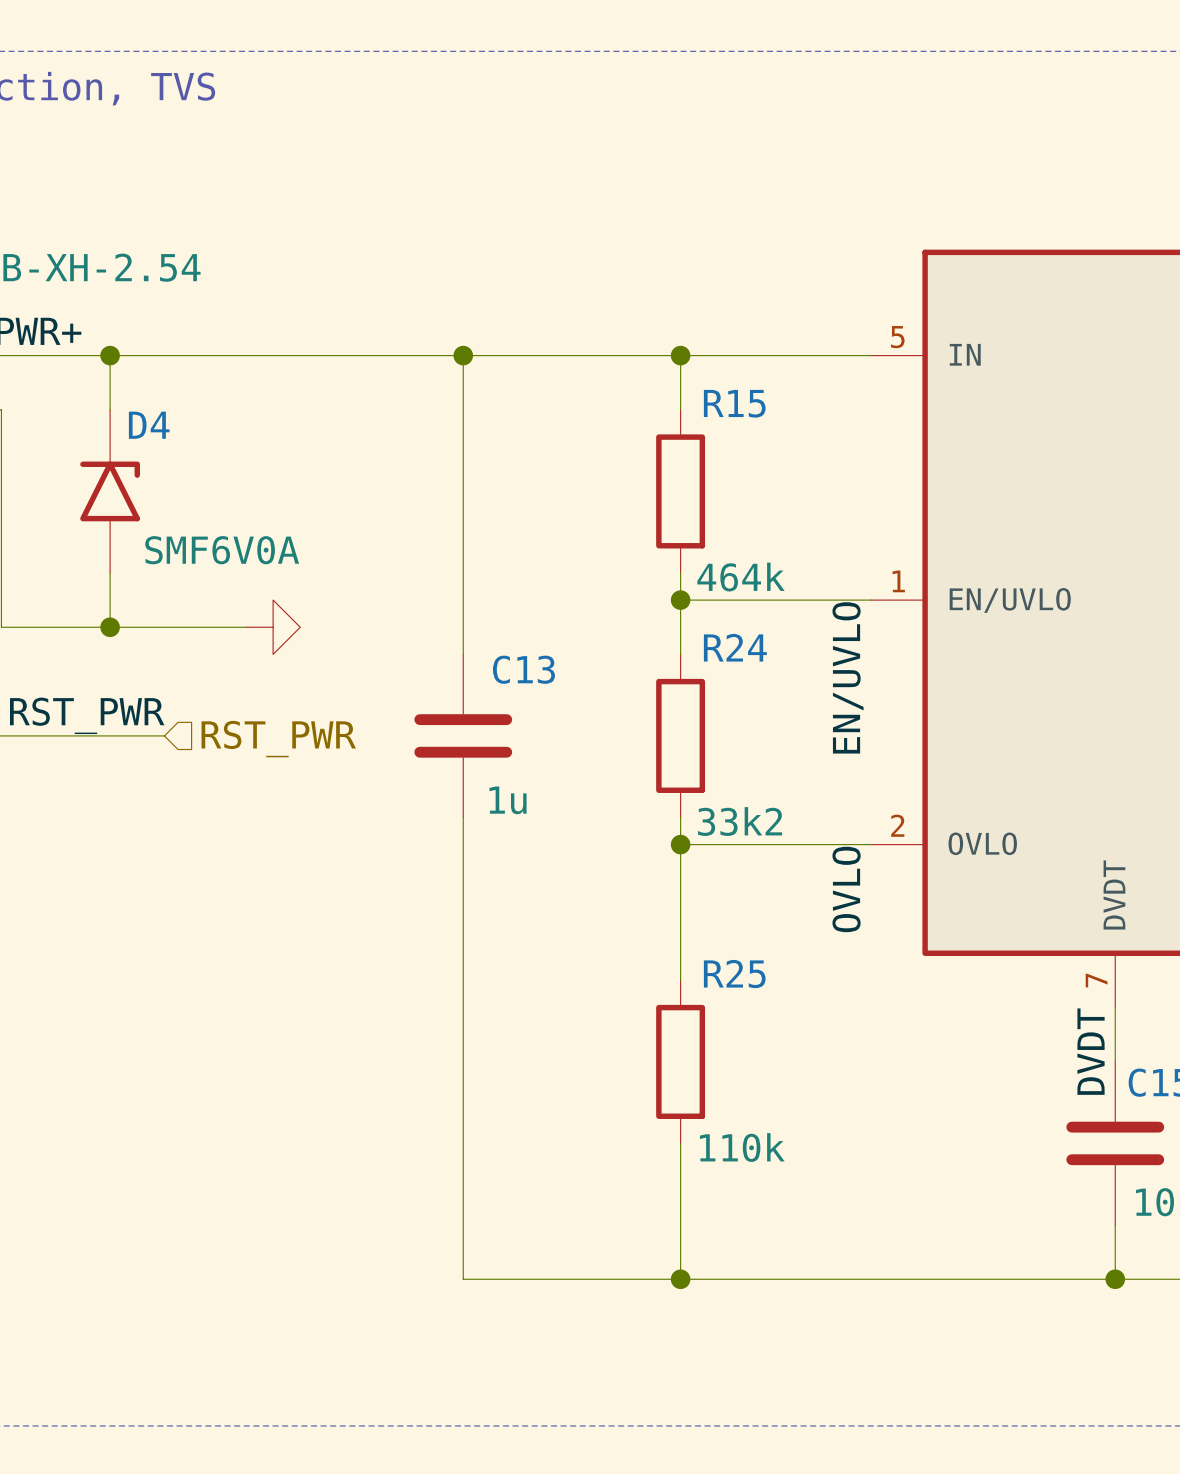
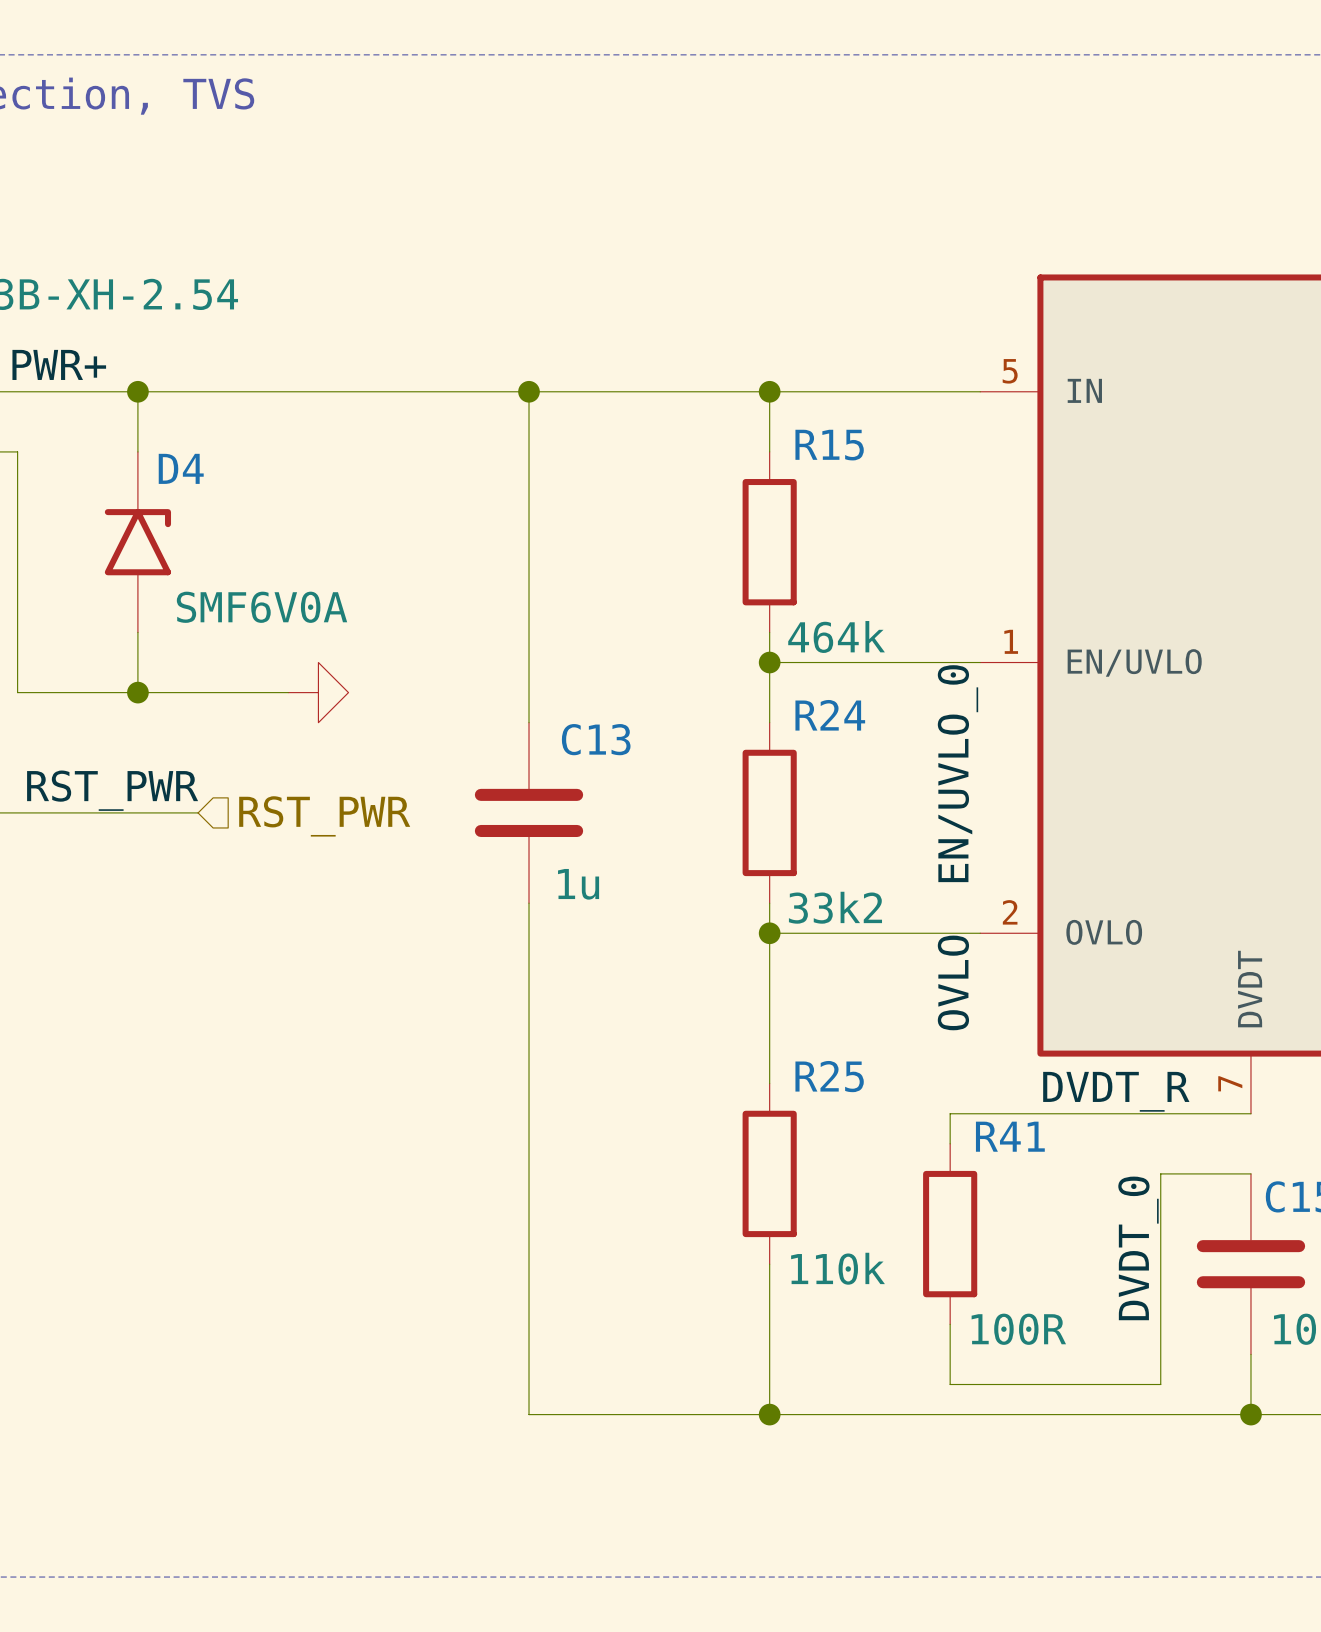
label: EN/UVLO (848, 677) -> EN/UVLO_0 (957, 773)
wire: (1115, 1007) (1115, 1061) -> (1250, 1113) (950, 1113) (950, 1143)
label: DVDT (1091, 1051) -> DVDT_R (1116, 1091)
wire: none -> (1250, 1173) (1160, 1173) (1160, 1384) (950, 1384) (950, 1324)
R41: none -> 100R (950, 1234)
label: none -> DVDT_0 (1138, 1248)

